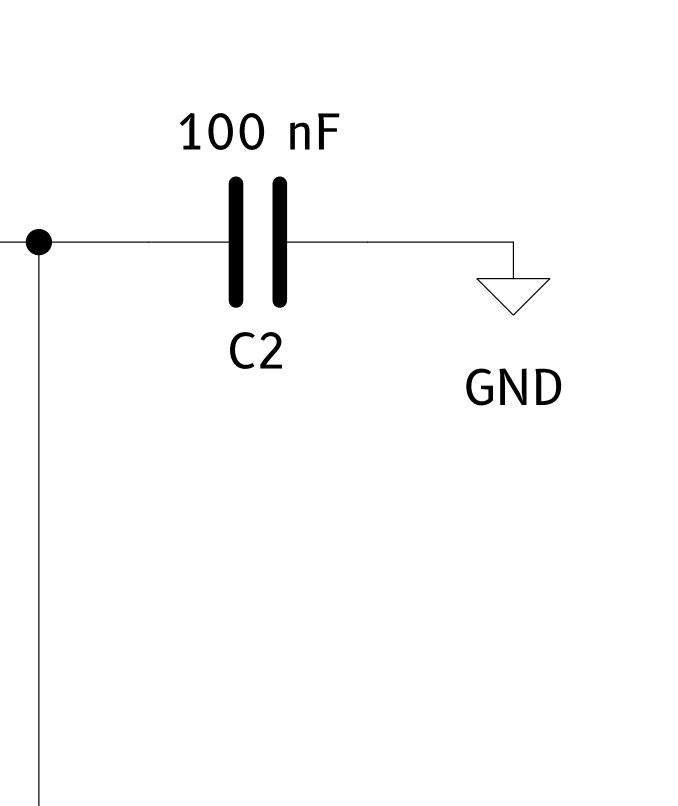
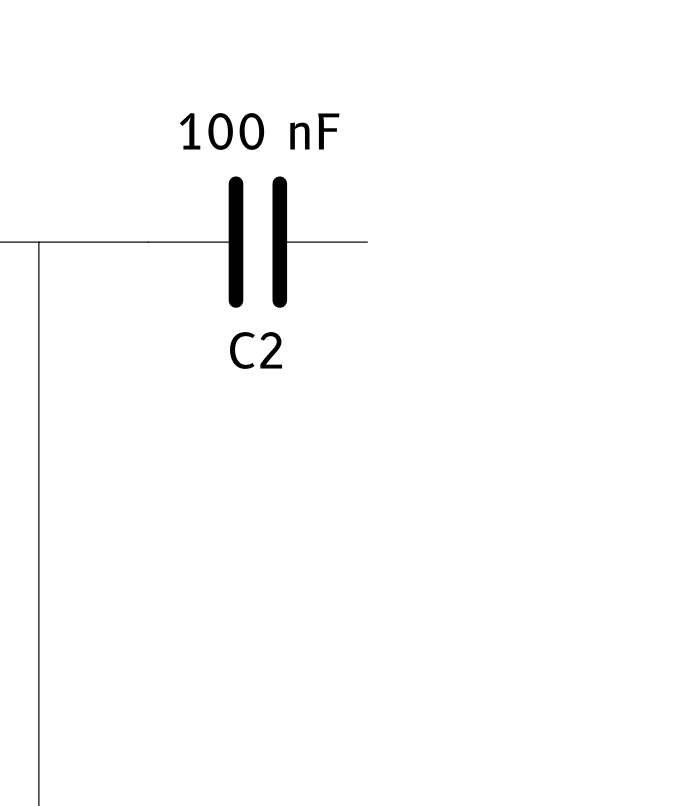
junction: (38, 242) -> none
wire: (367, 242) (513, 242) -> none
power symbol: GND (513, 278) -> none

